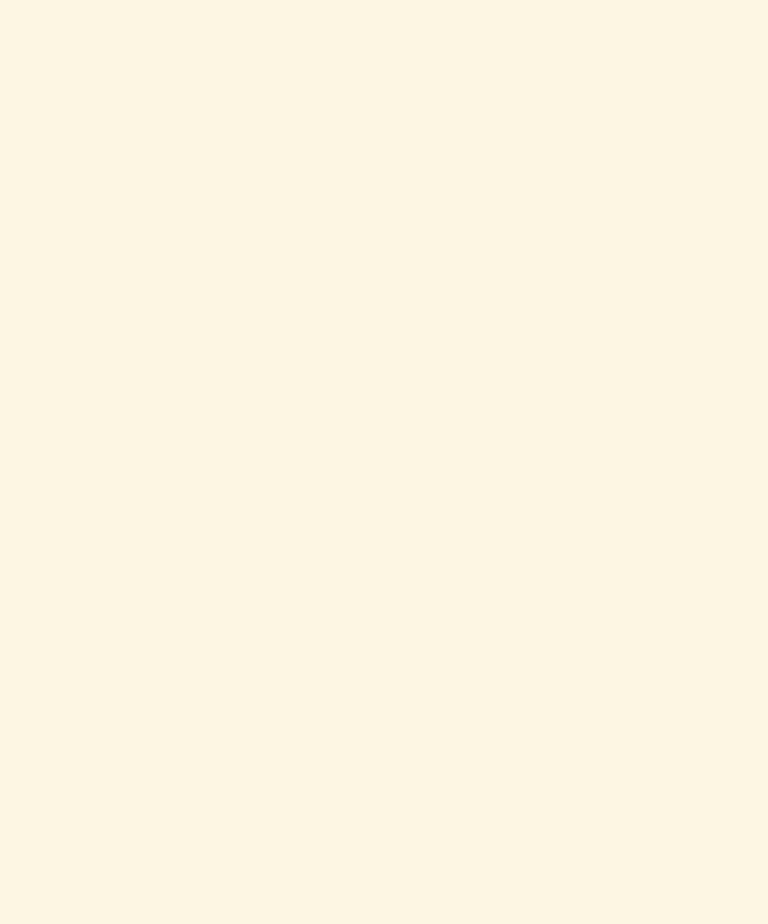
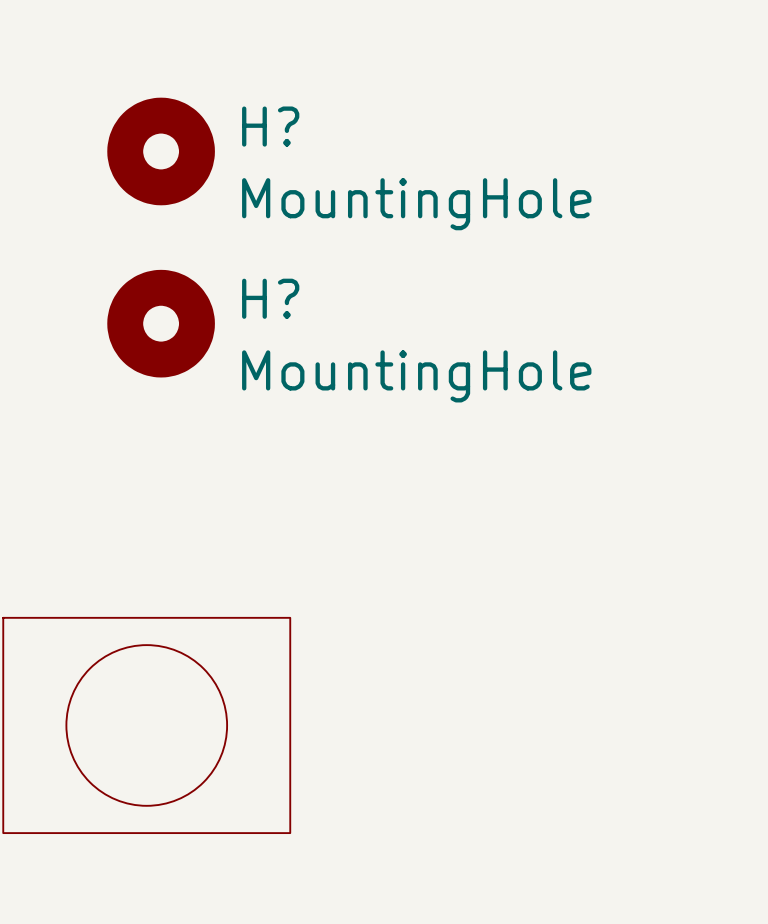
H?: none -> MountingHole (161, 151)
H?: none -> MountingHole (161, 323)
part: none -> (146, 725)

